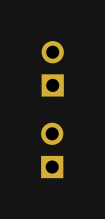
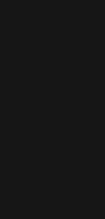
part: (52, 68) -> none
part: (52, 150) -> none

